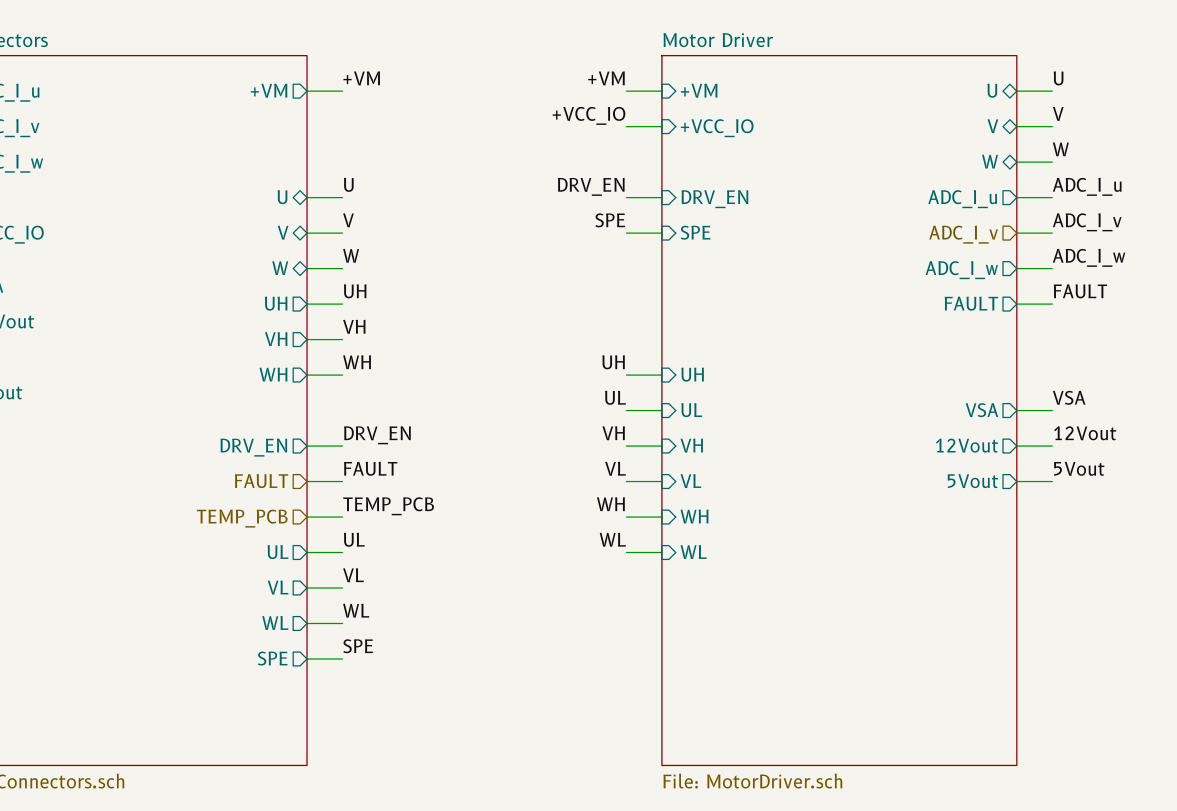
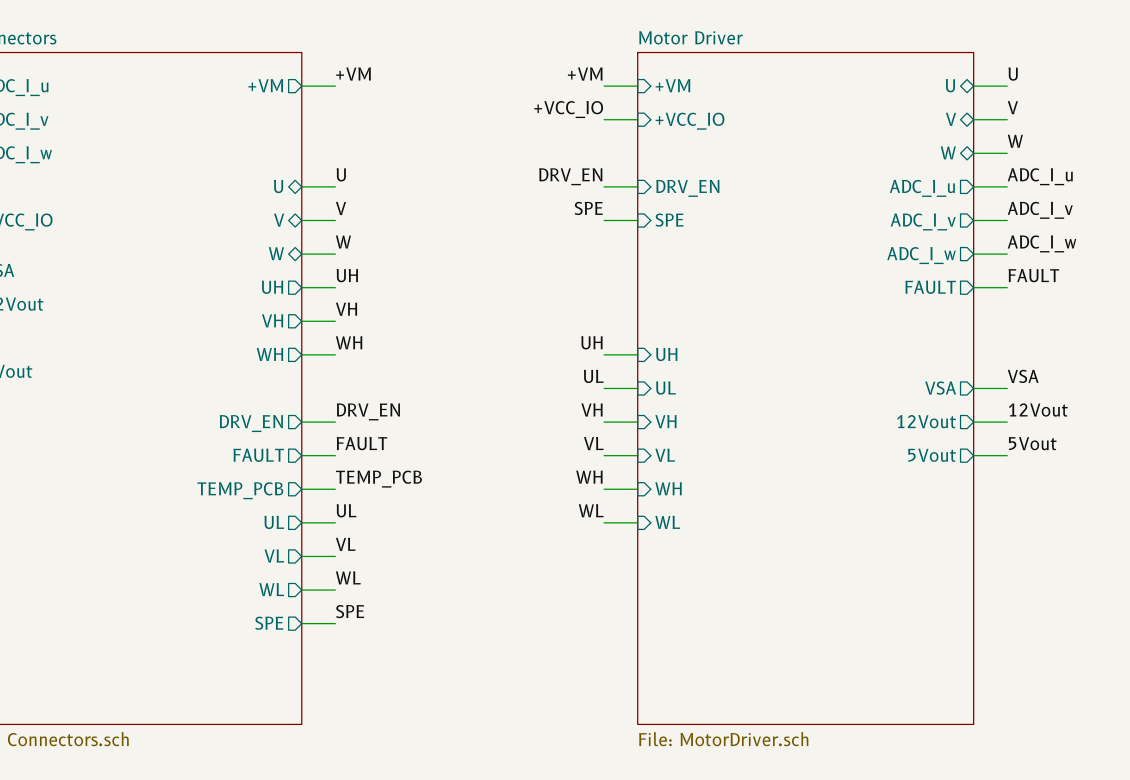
hierarchical label: ADC_I_v (963, 234) -> none
sheet pin: none -> ADC_I_v (923, 221)
hierarchical label: FAULT (261, 481) -> none
sheet pin: none -> FAULT (258, 455)
hierarchical label: TEMP_PCB (242, 518) -> none
sheet pin: none -> TEMP_PCB (240, 490)

